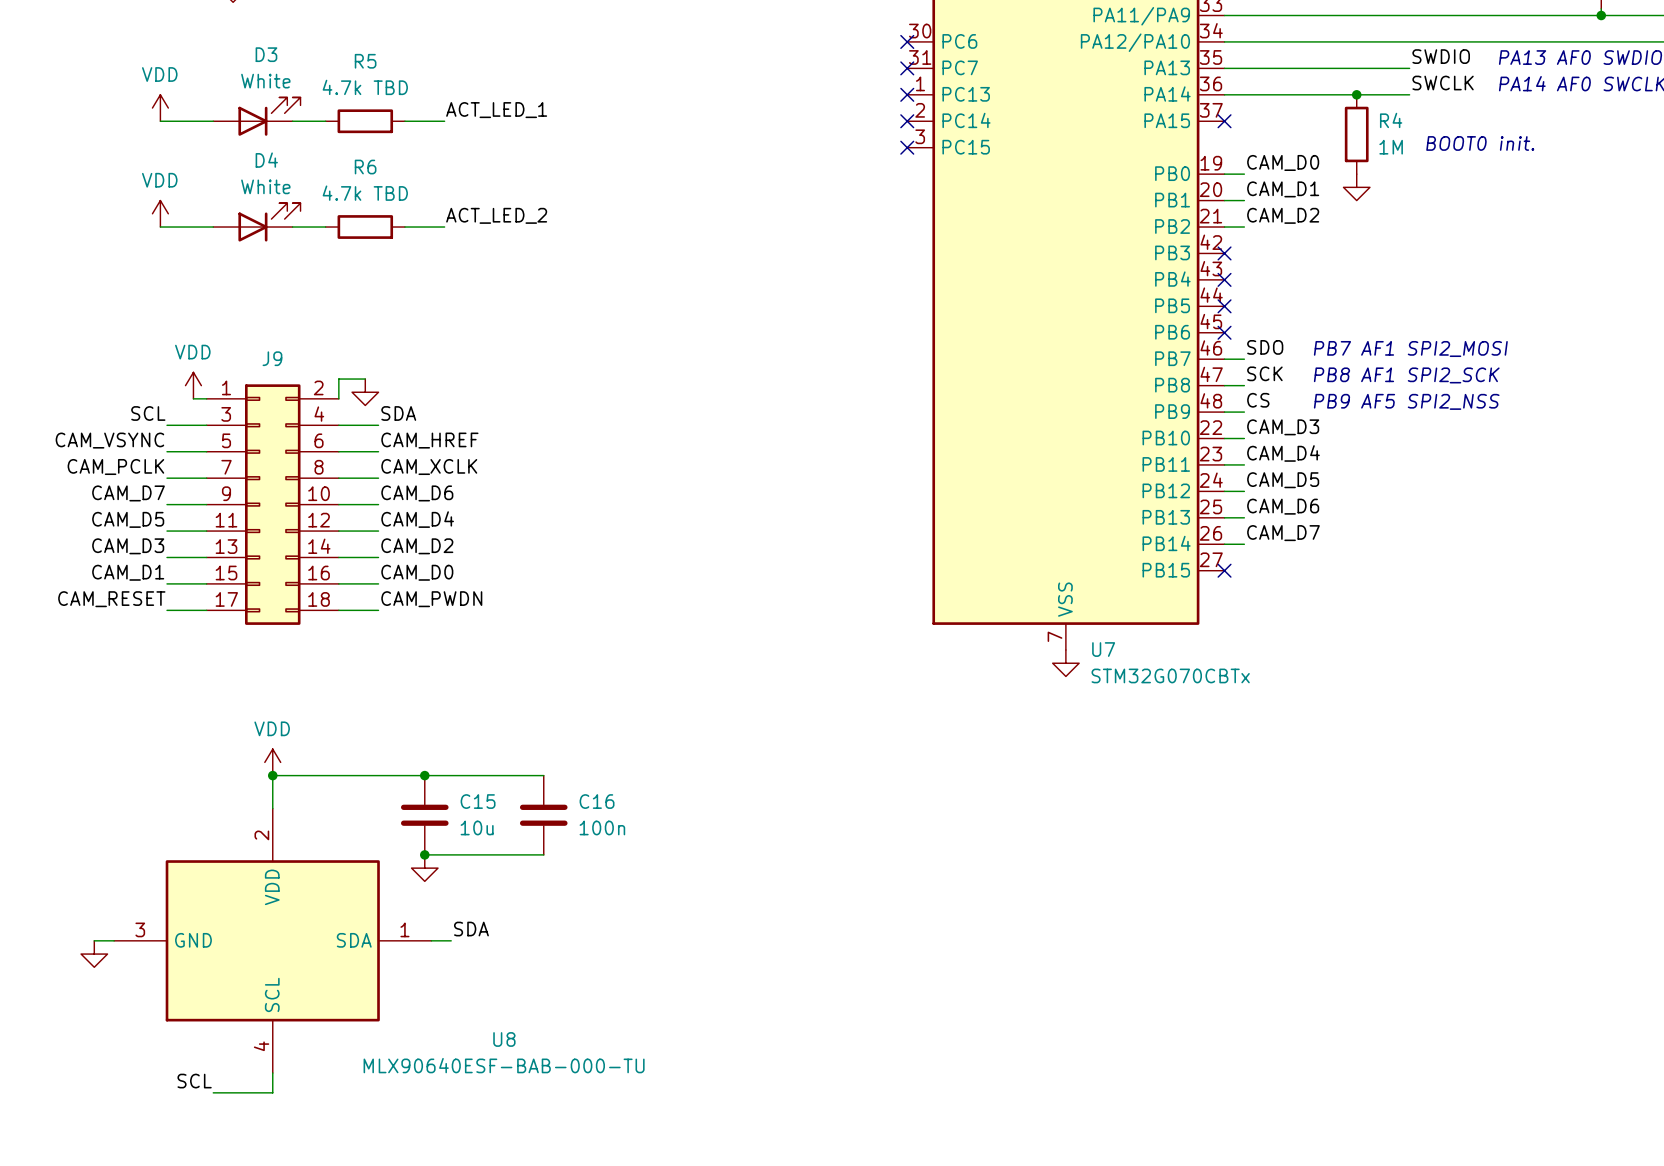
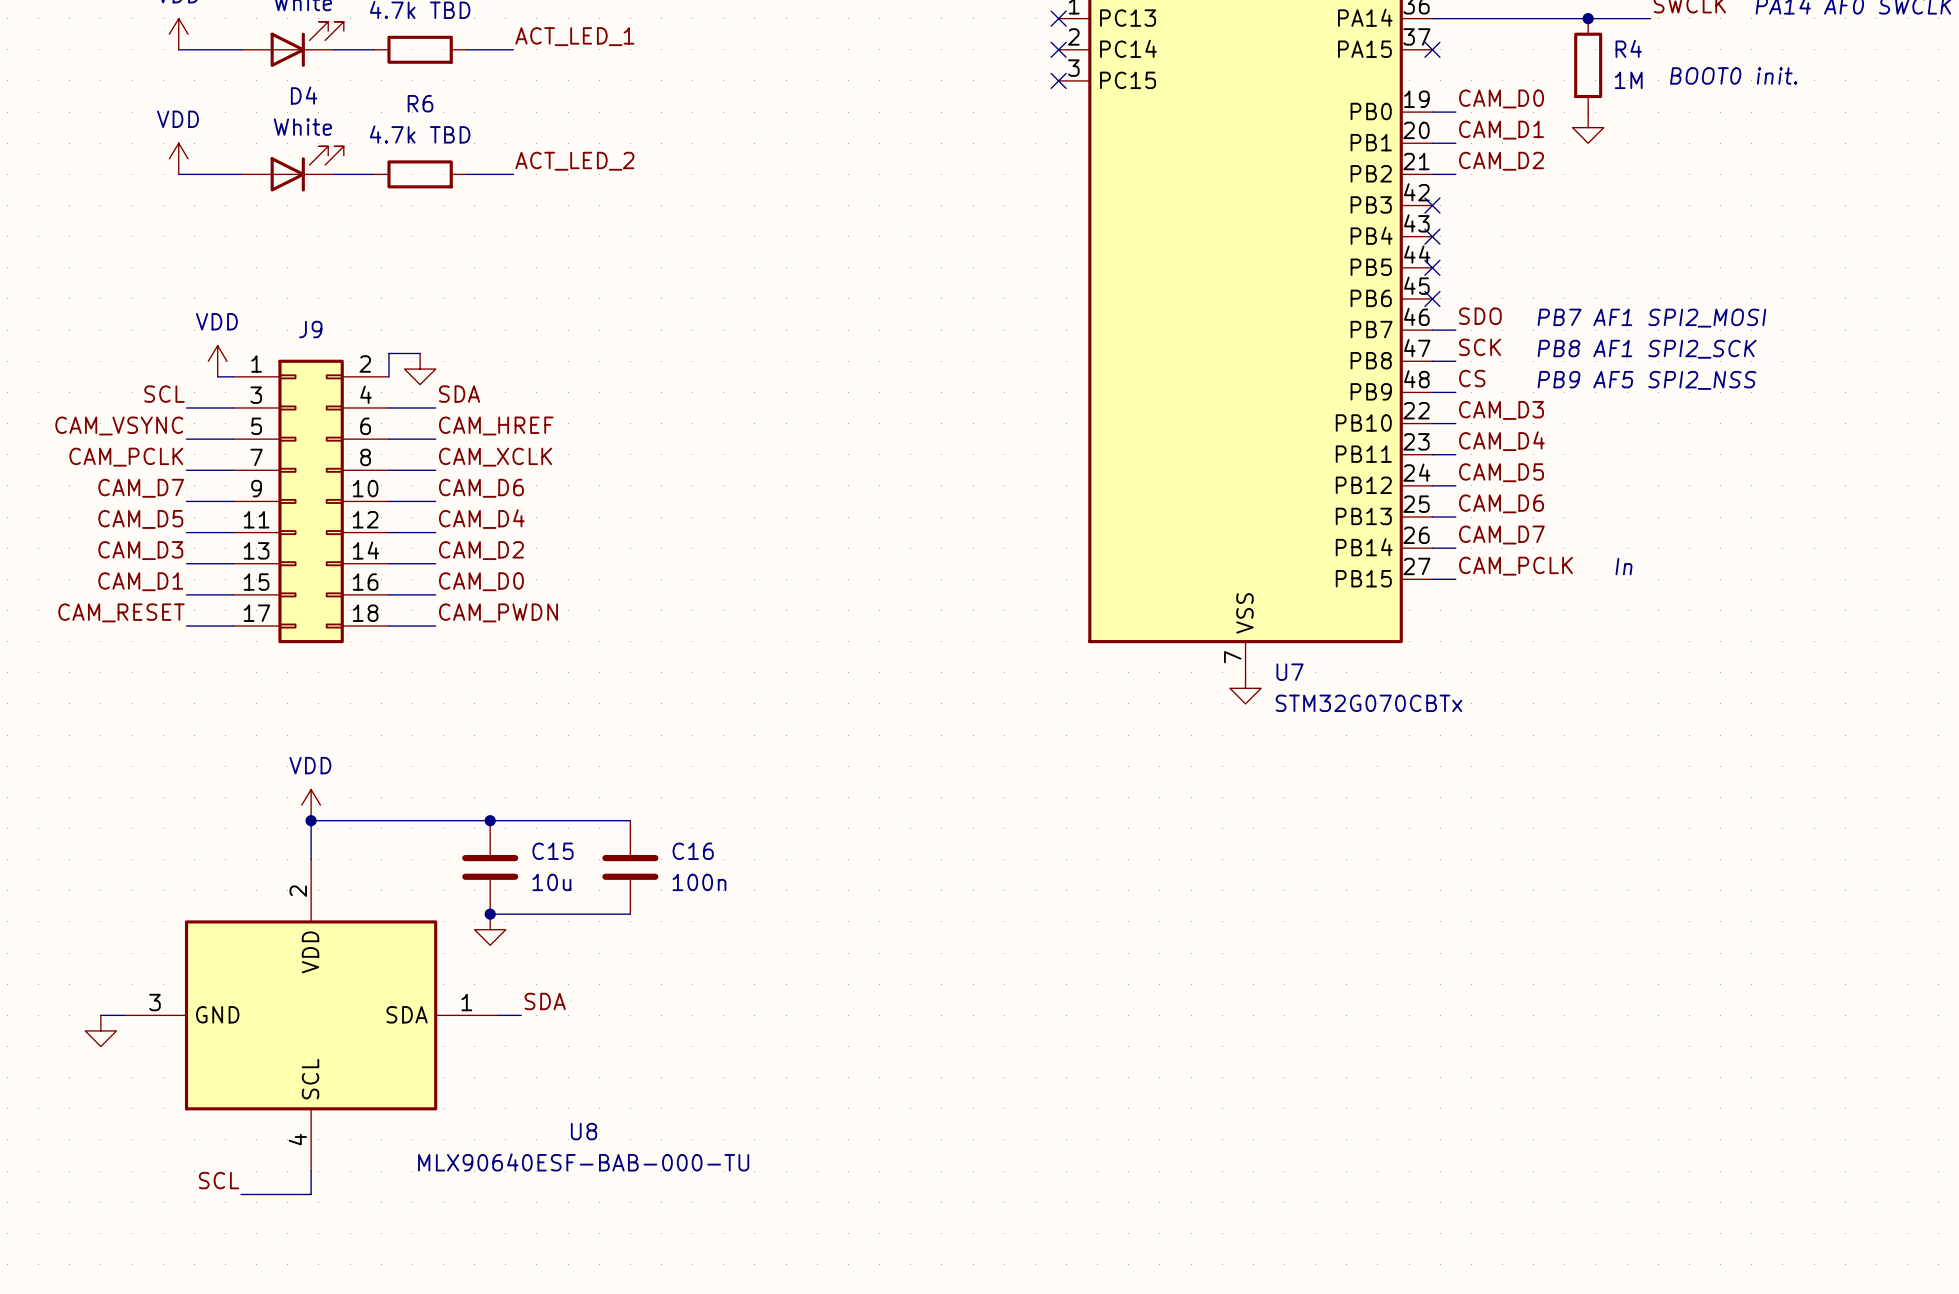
label: none -> CAM_PCLK (1515, 566)
text: none -> In (1624, 566)
wire: none -> (1432, 579) (1455, 579)
no-connect mark: (1224, 570) -> none

